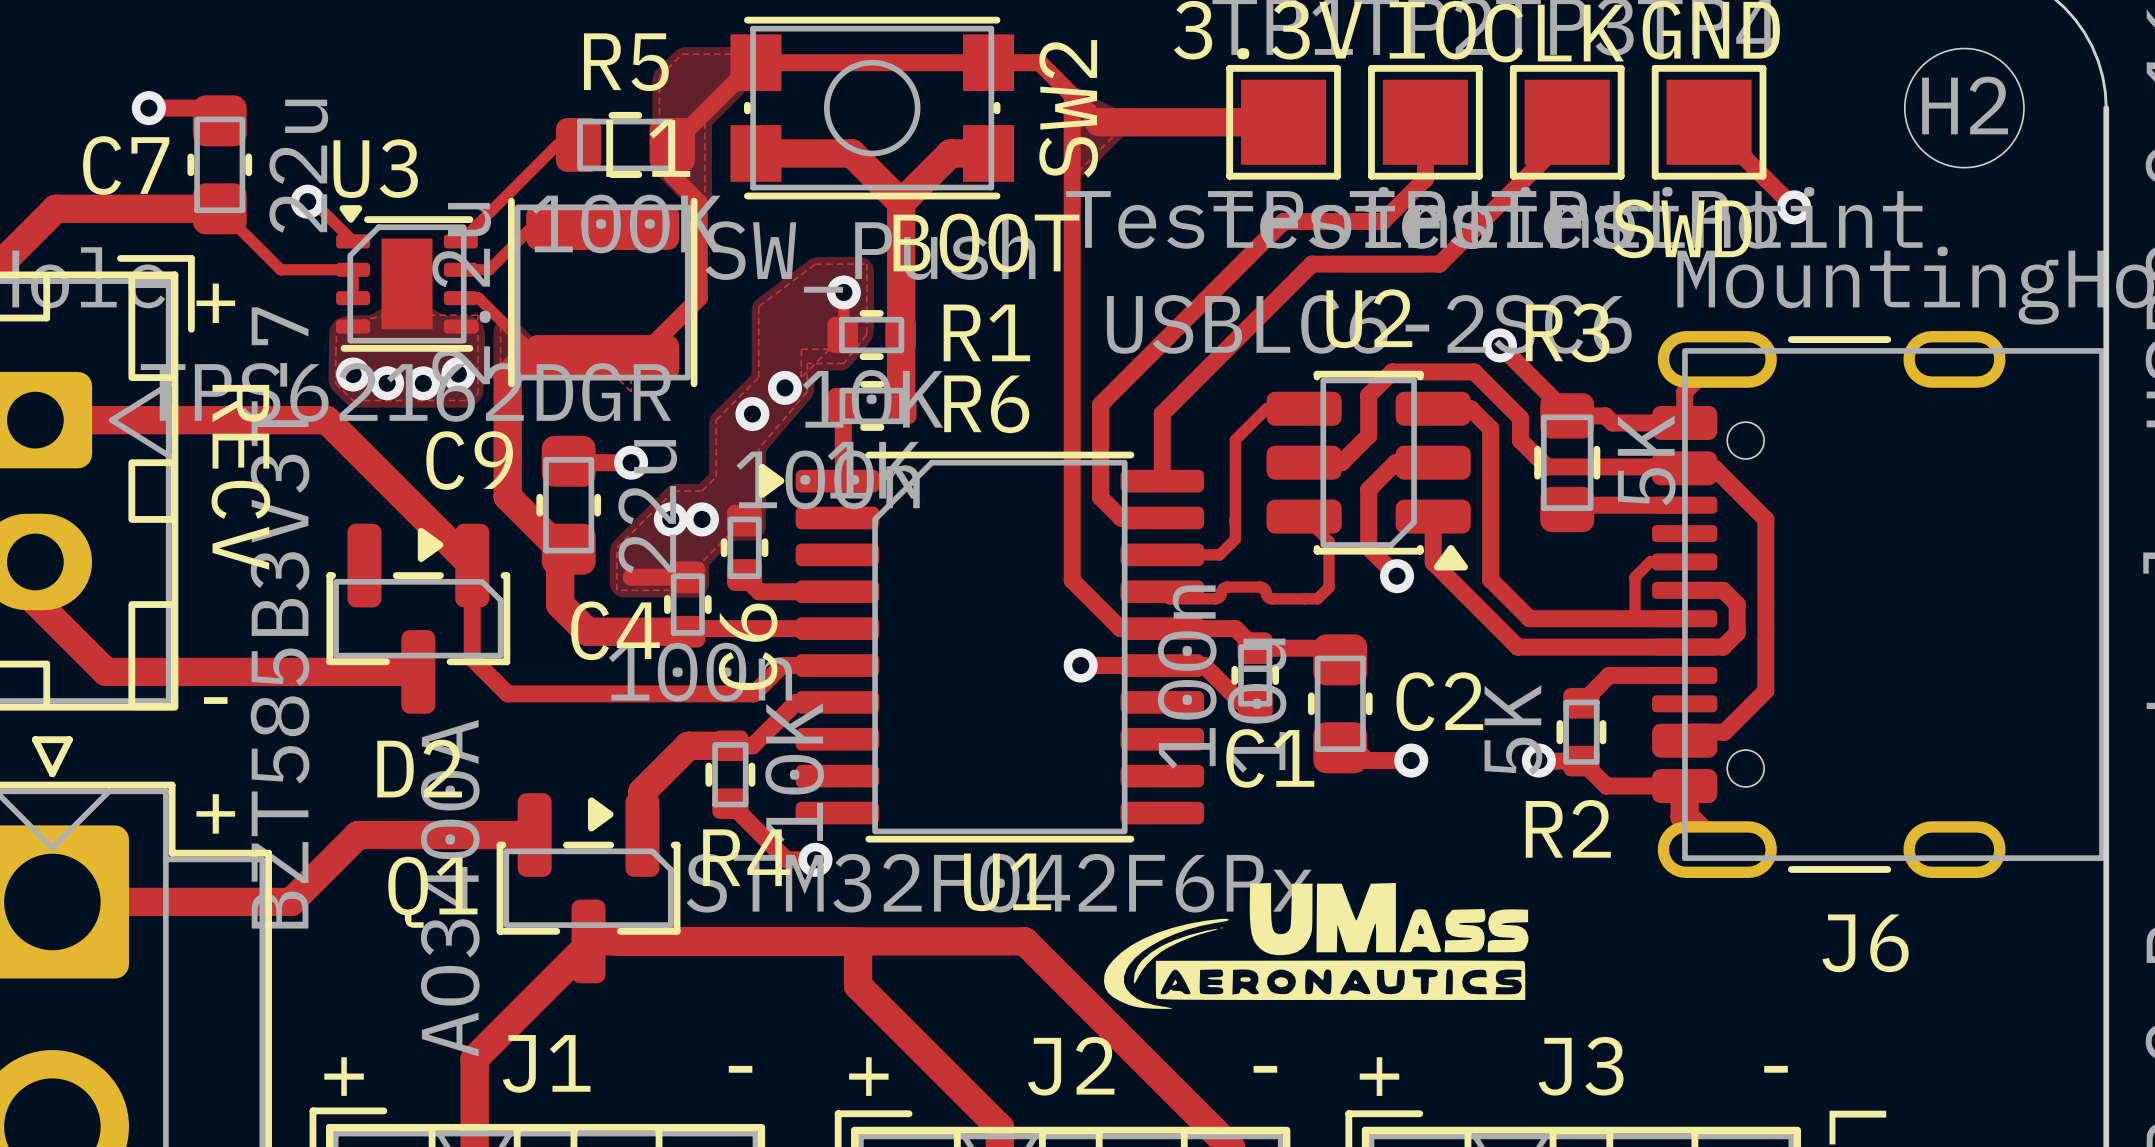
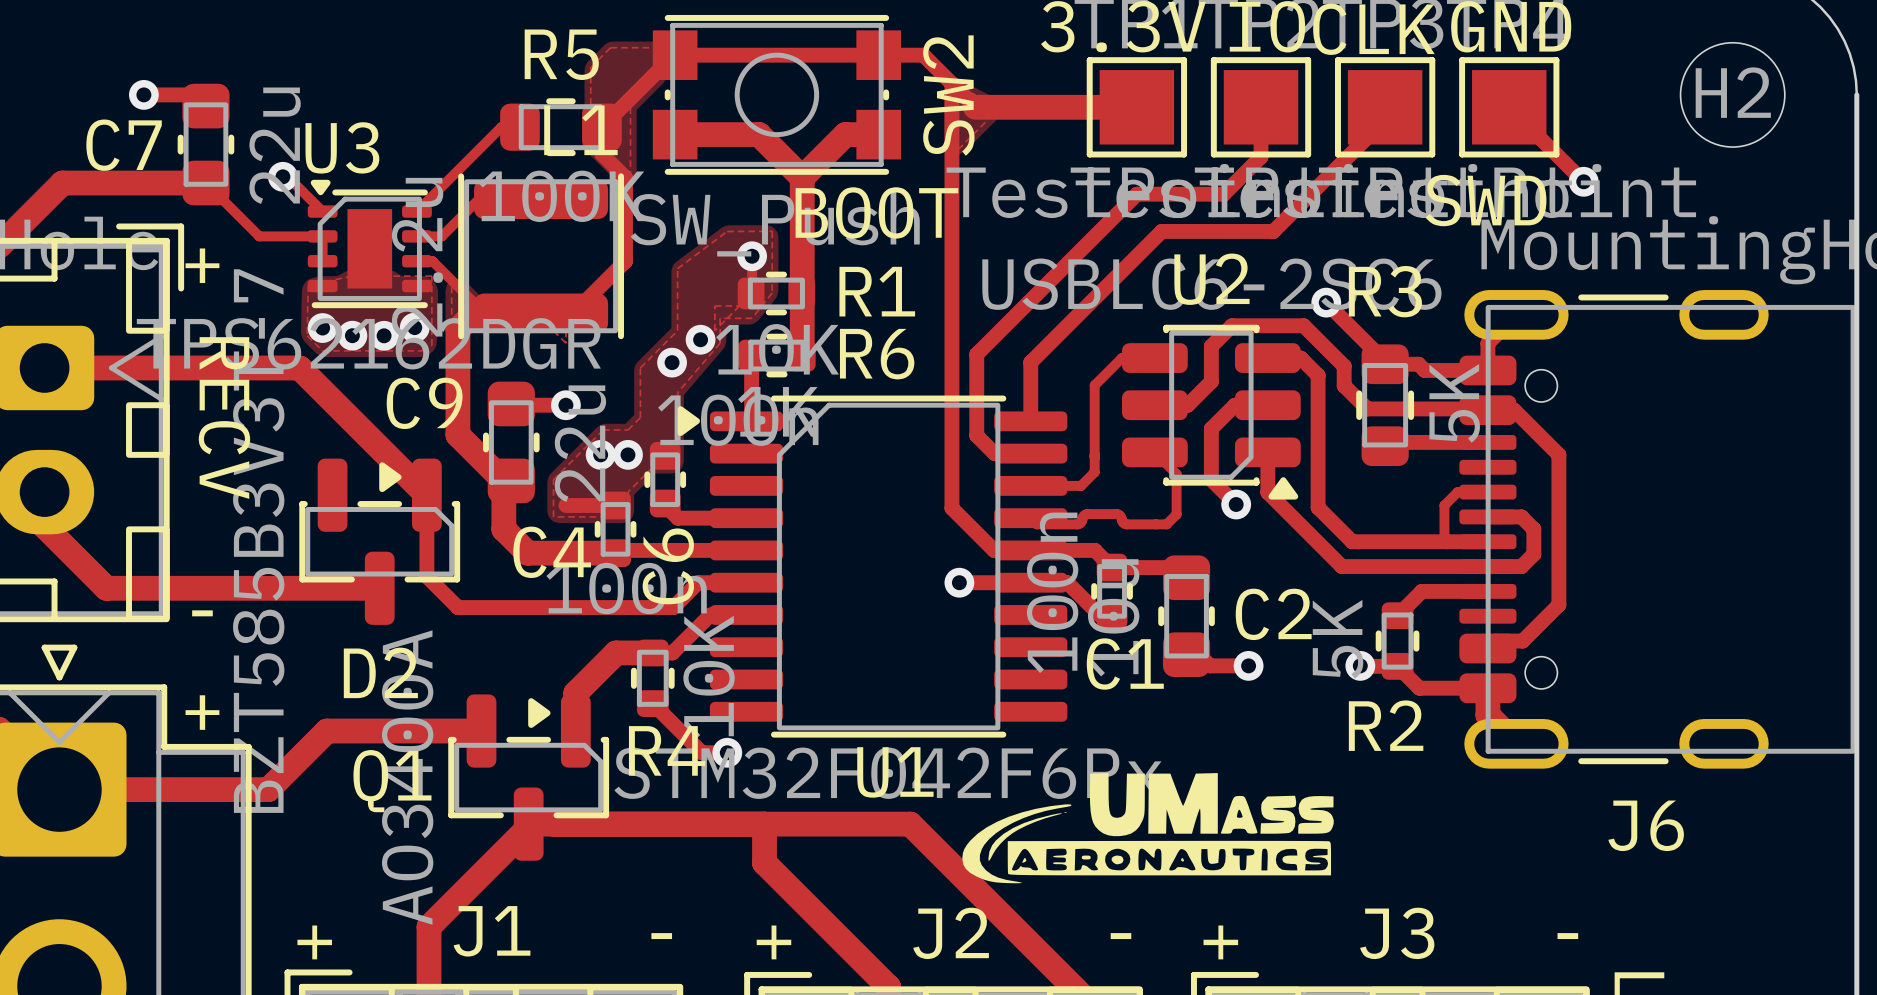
drawing position: (1316, 945) -> (1148, 828)

